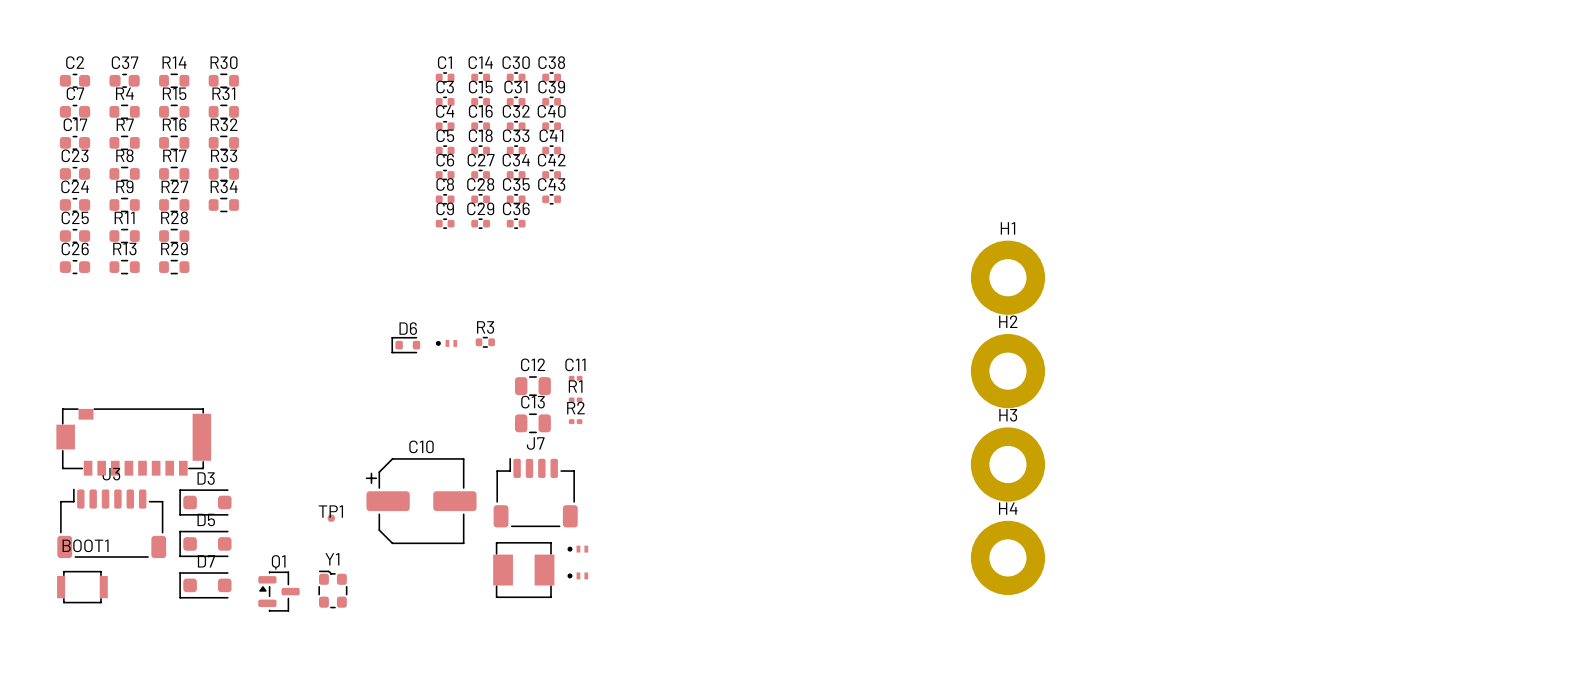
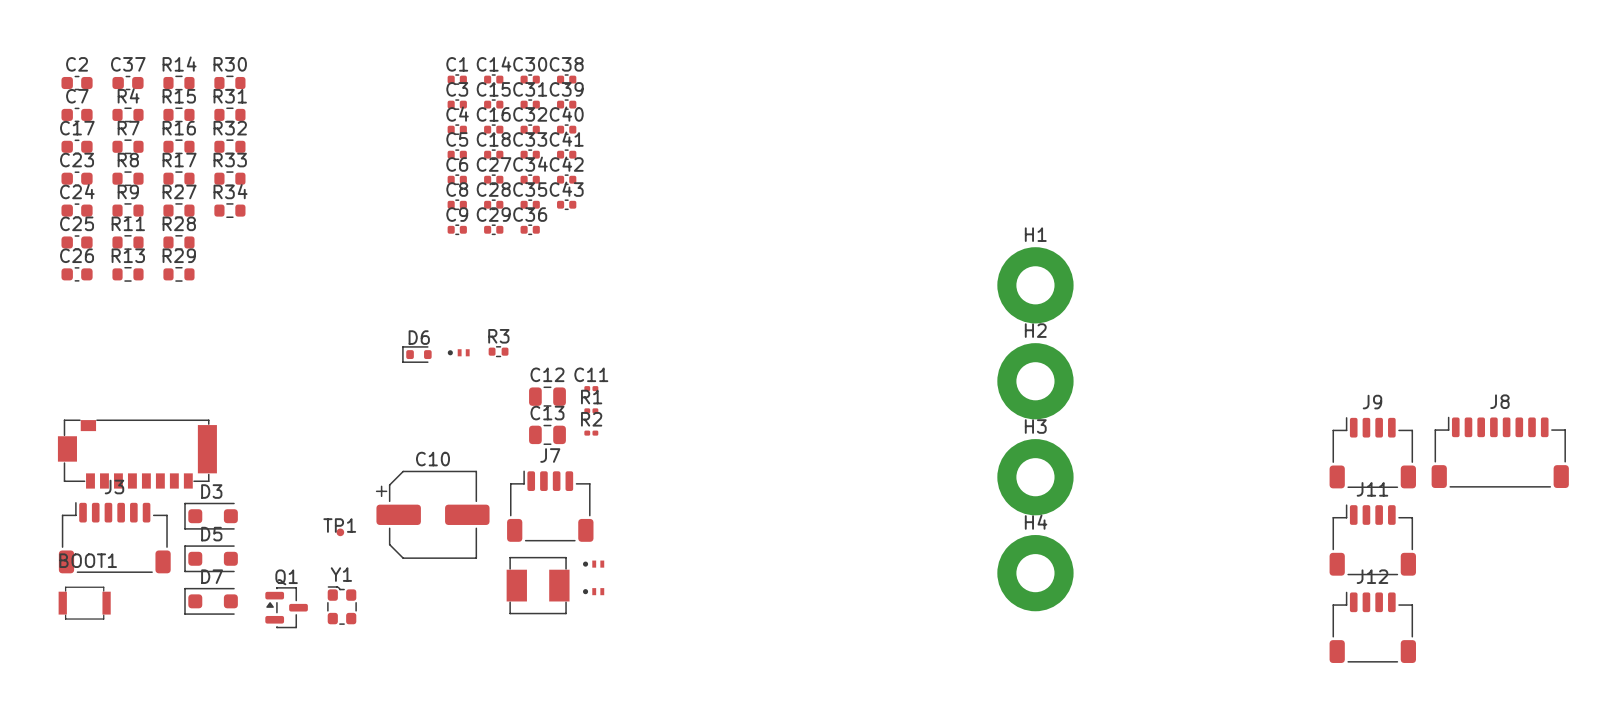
J9: none -> (1372, 452)
J8: none -> (1500, 452)
J11: none -> (1372, 540)
J12: none -> (1372, 627)

